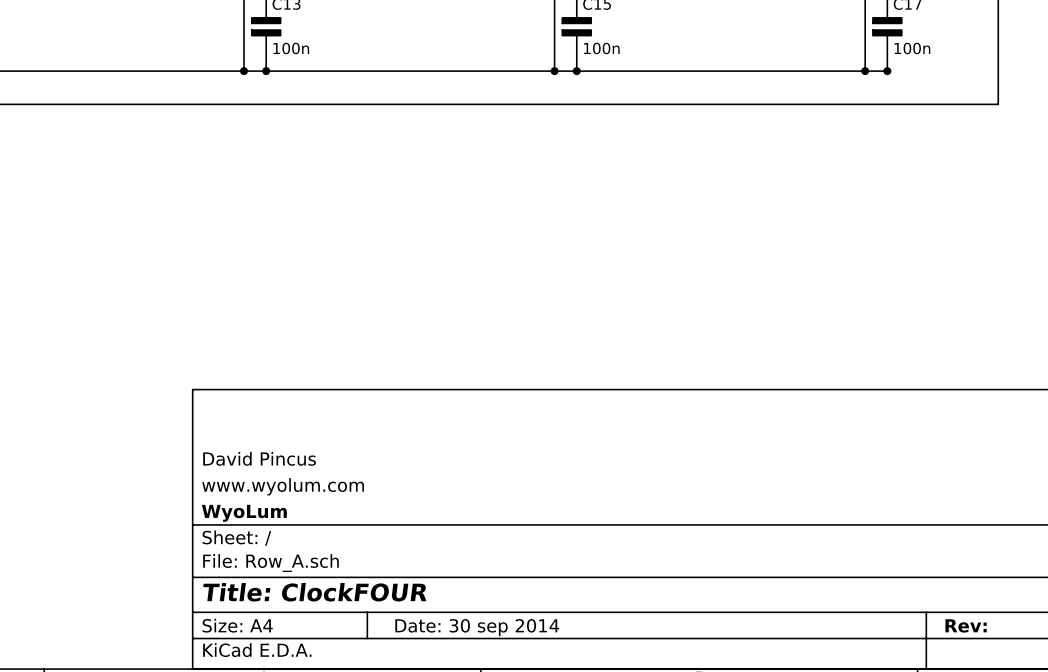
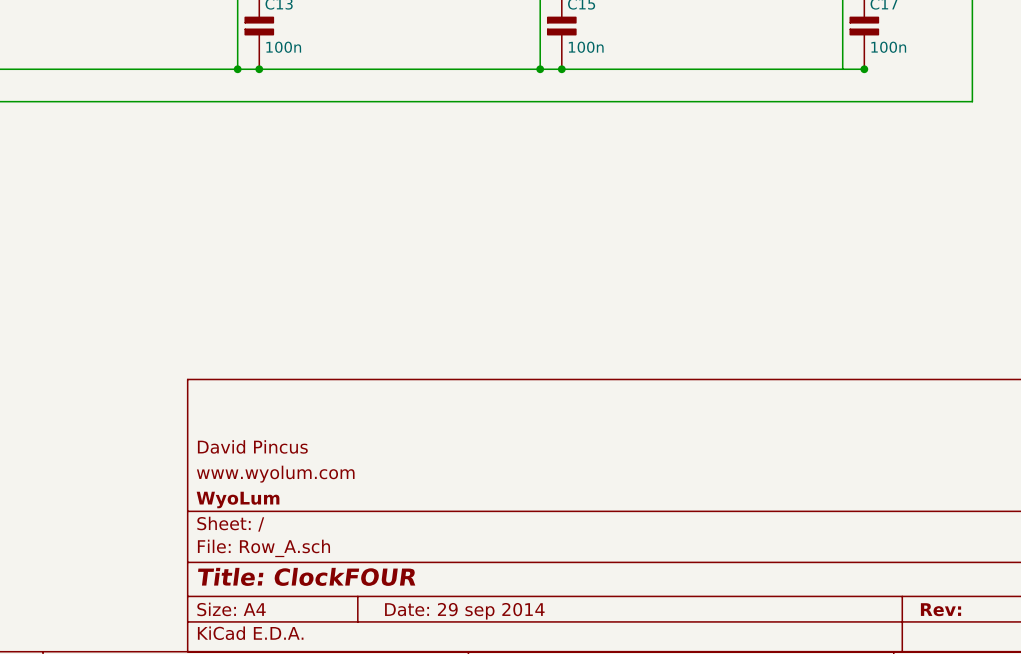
junction: (865, 71) -> none
title block: Date: 30 sep 2014 (477, 627) -> Date: 29 sep 2014 (464, 611)

